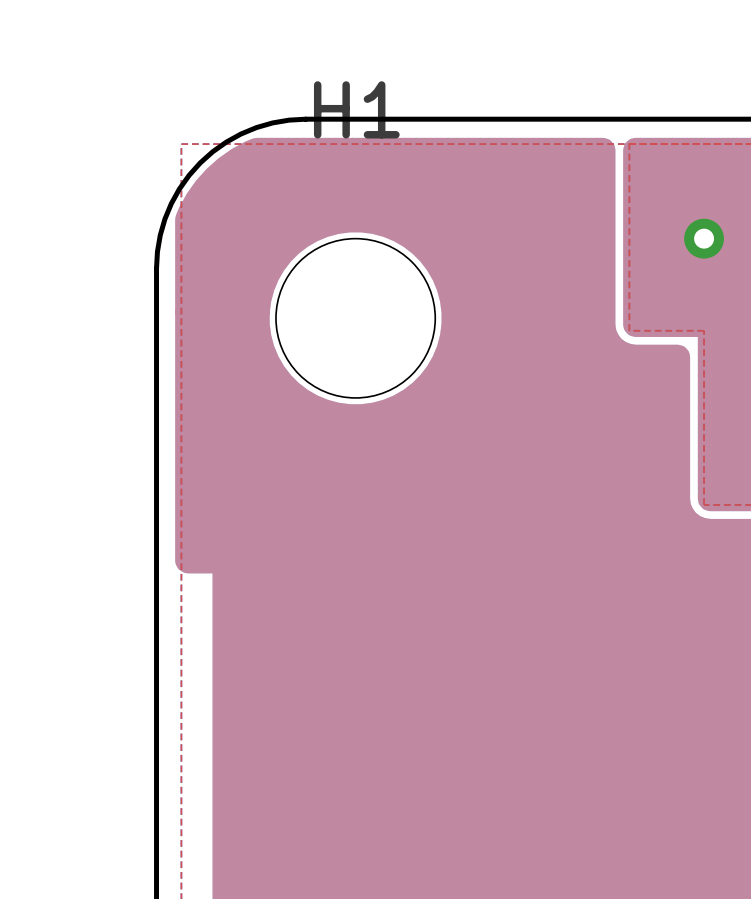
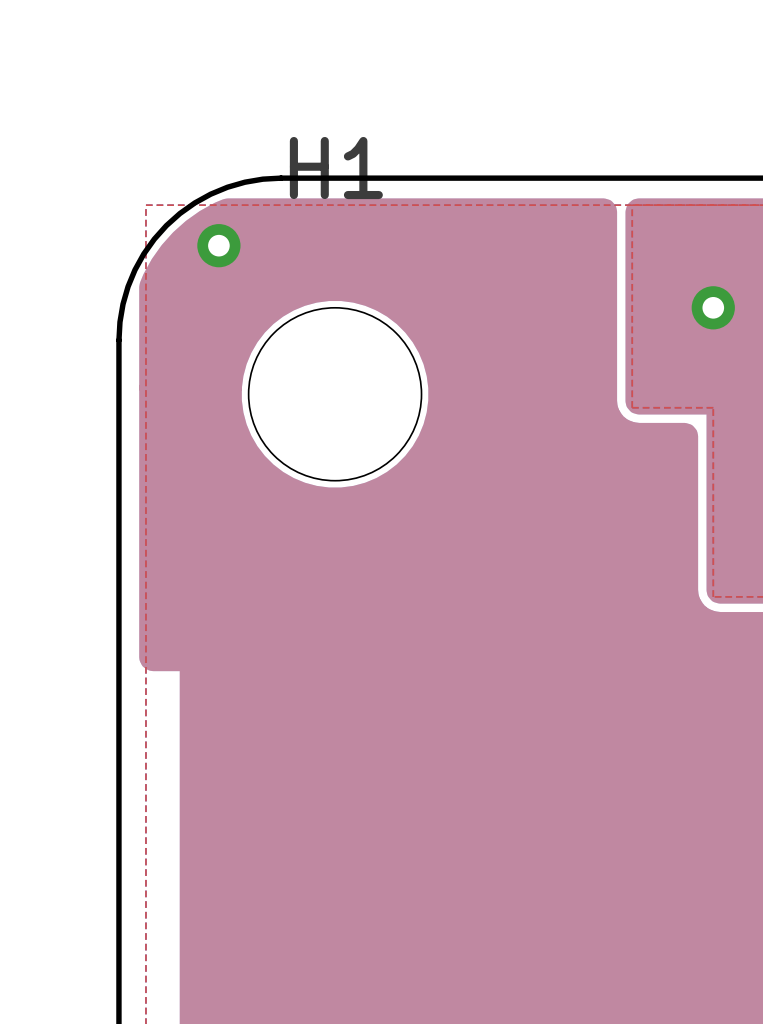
via: none -> (218, 245)

